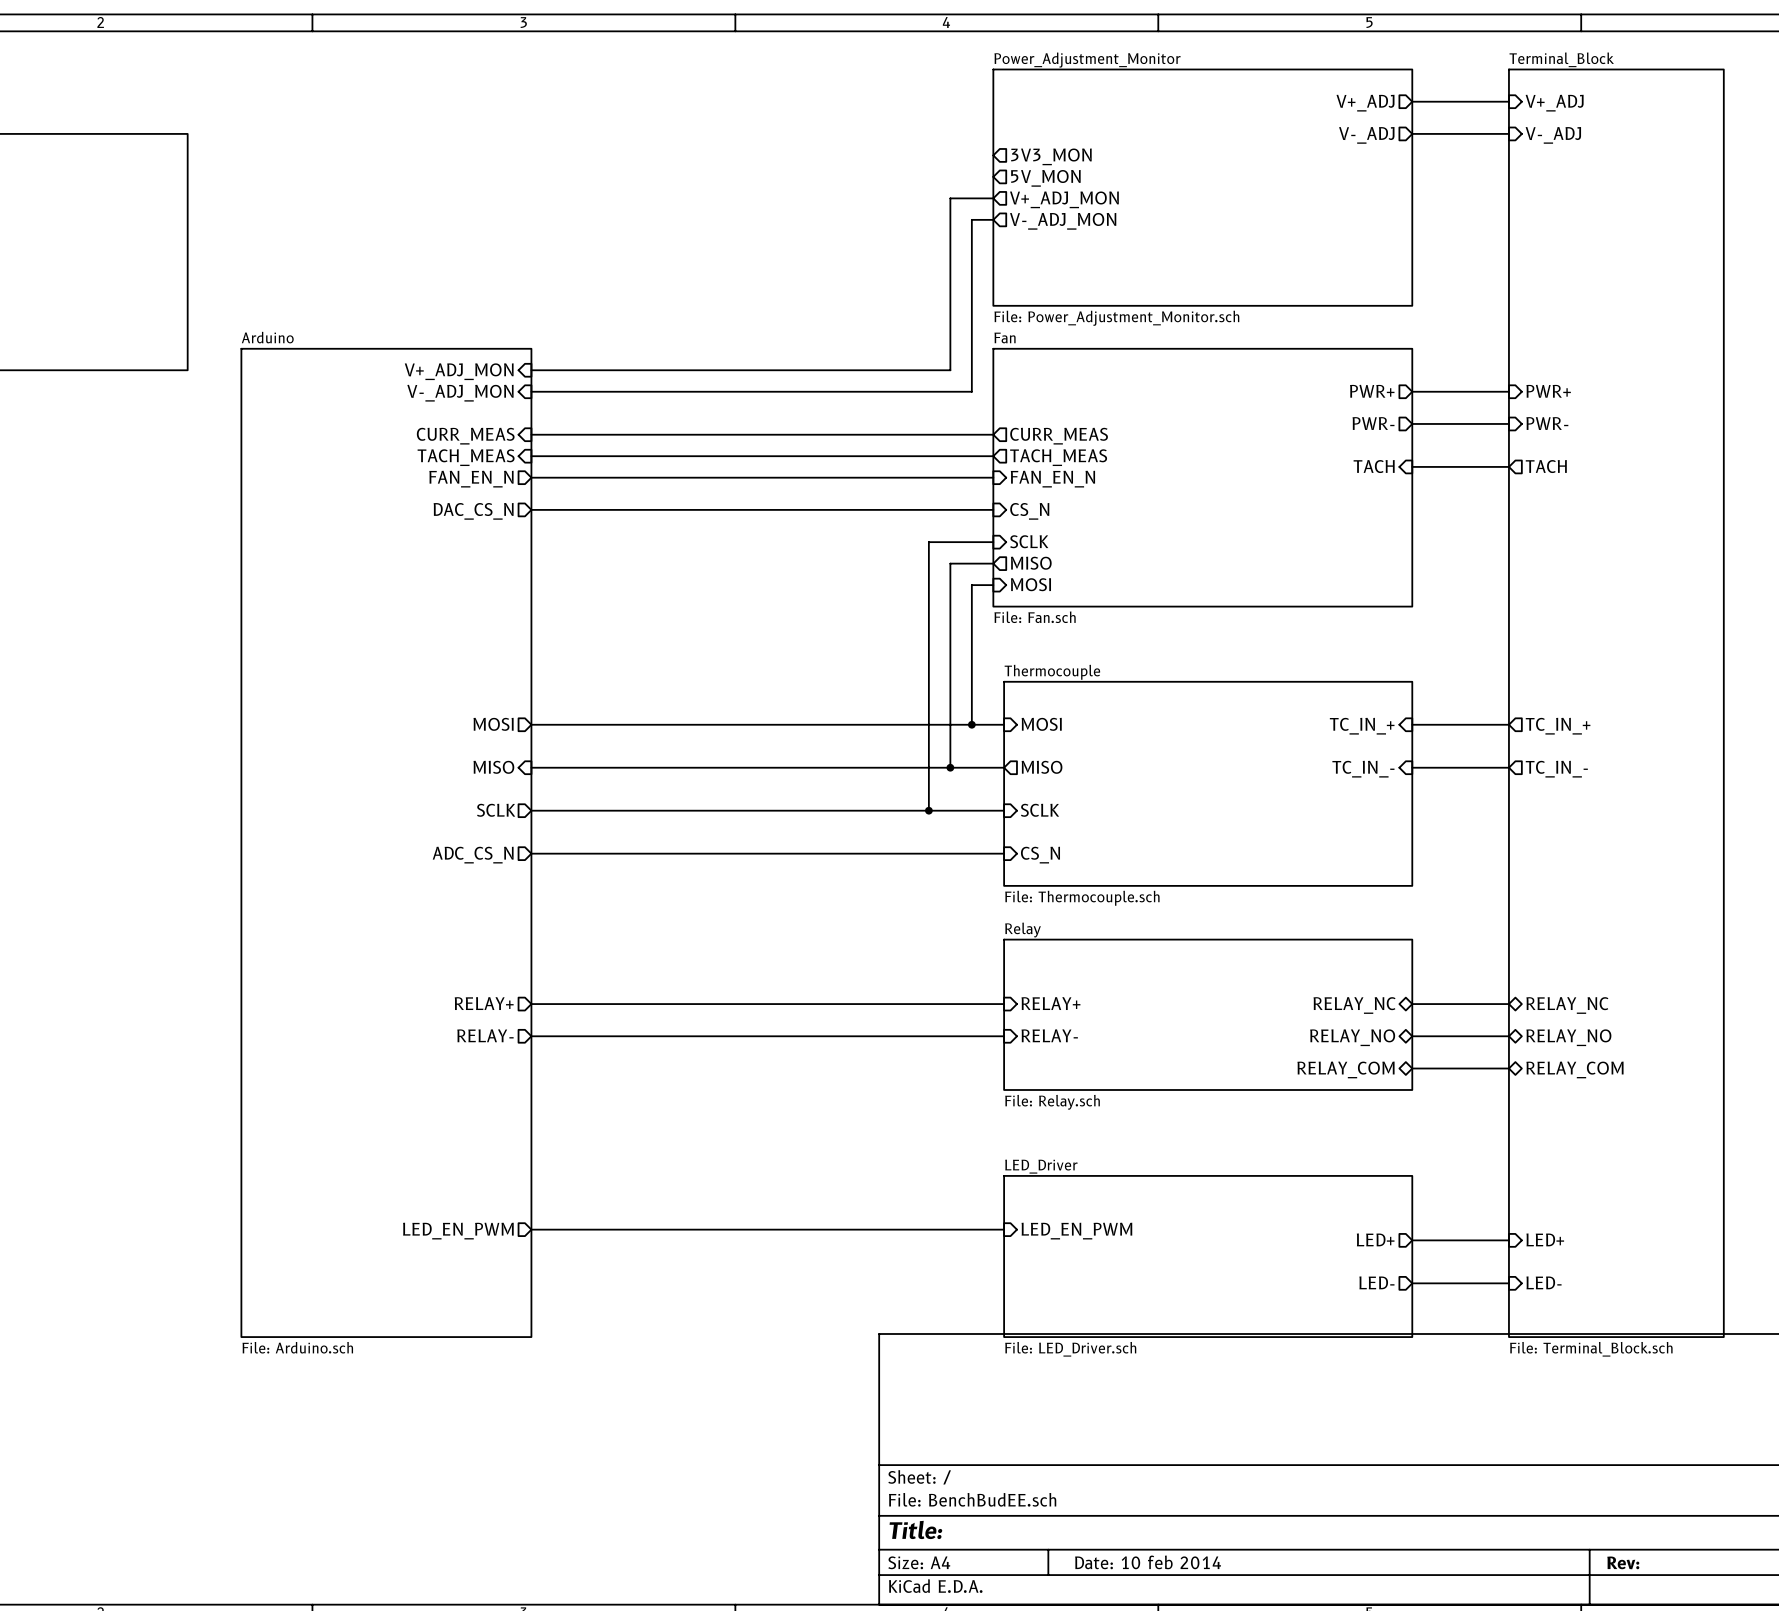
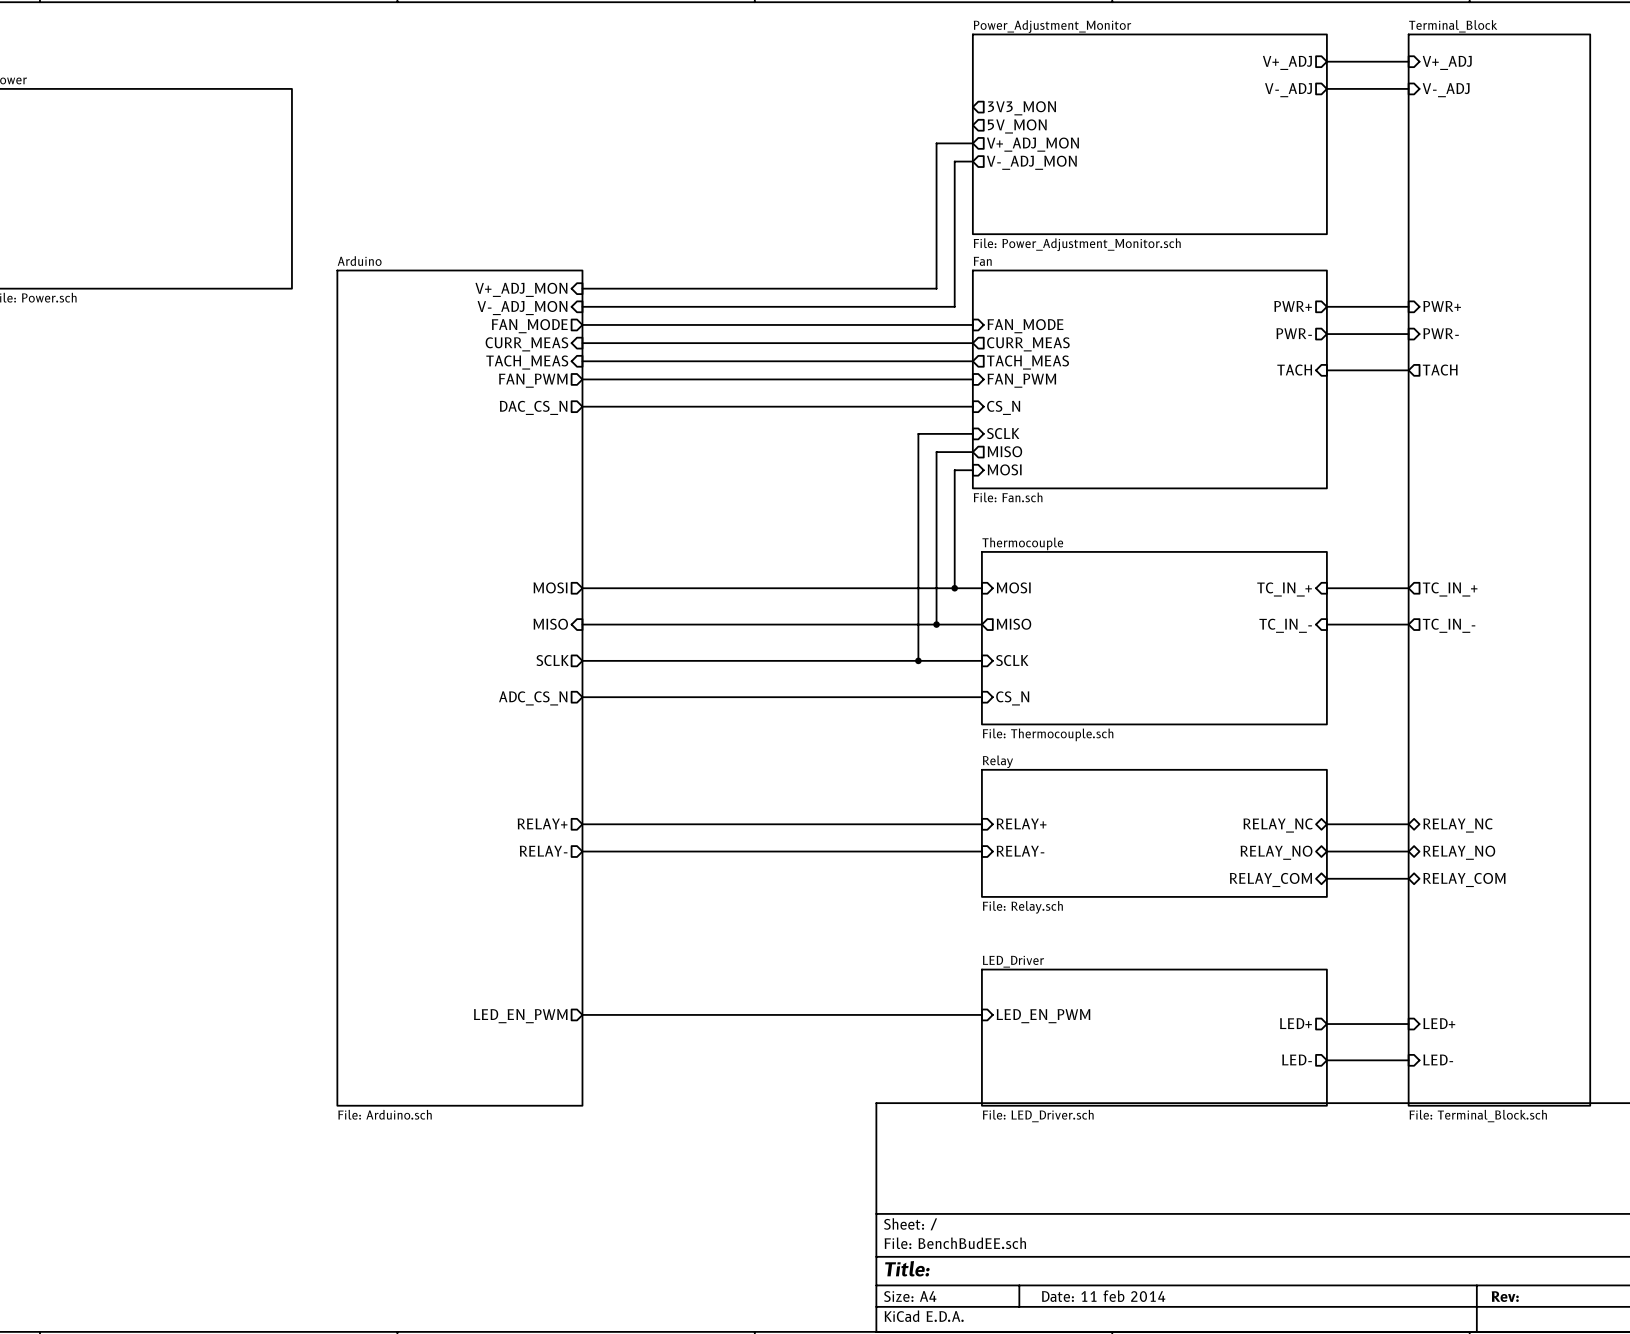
wire: none -> (582, 324) (972, 324)
sheet pin: none -> FAN_MODE (529, 326)
sheet pin: none -> FAN_MODE (1025, 326)
sheet pin: FAN_EN_N (471, 479) -> FAN_PWM (533, 380)
sheet pin: FAN_EN_N (1052, 479) -> FAN_PWM (1021, 380)
title block: Date: 10 feb 2014 (1148, 1562) -> Date: 11 feb 2014 (1103, 1296)

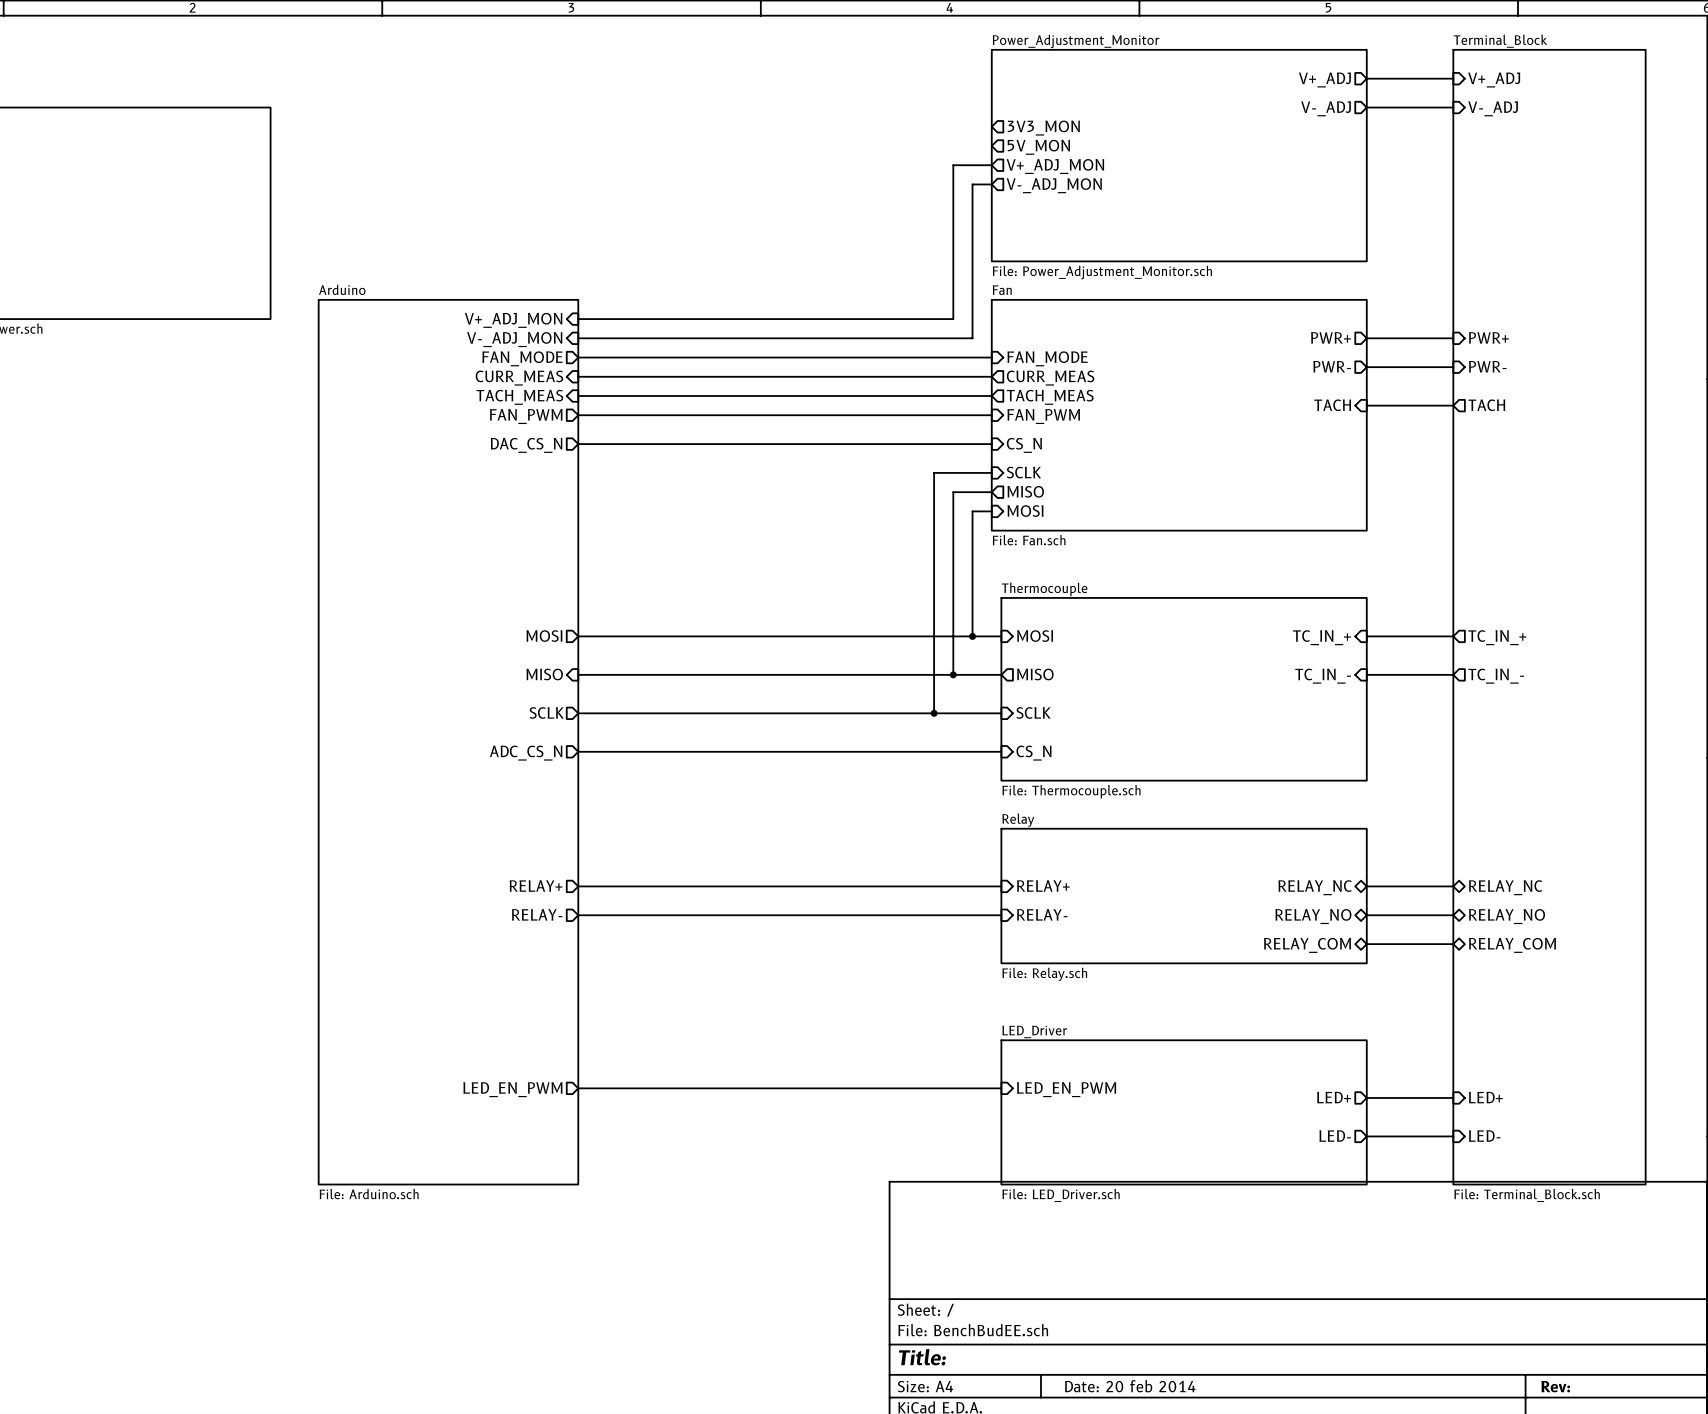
title block: Date: 11 feb 2014 (1103, 1296) -> Date: 20 feb 2014 (1130, 1386)

